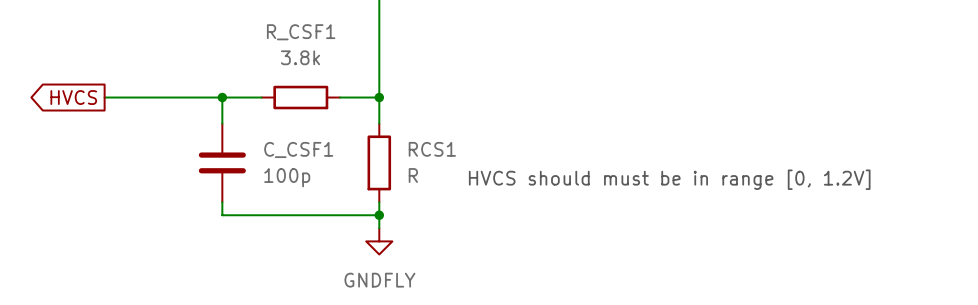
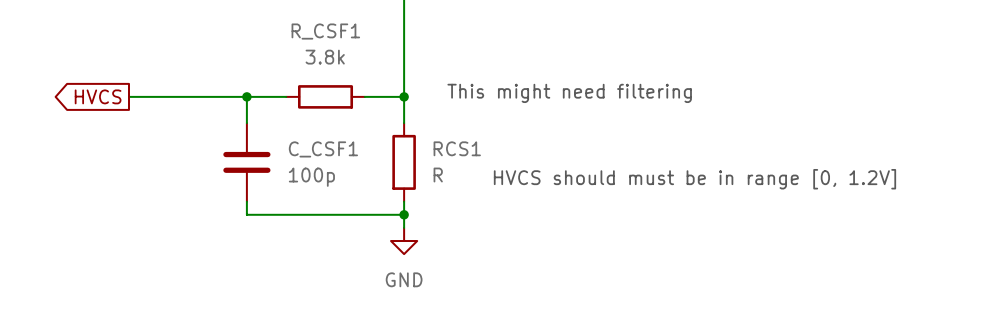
text: none -> This might need filtering (569, 93)
power symbol: GNDFLY (379, 241) -> GND (404, 241)

